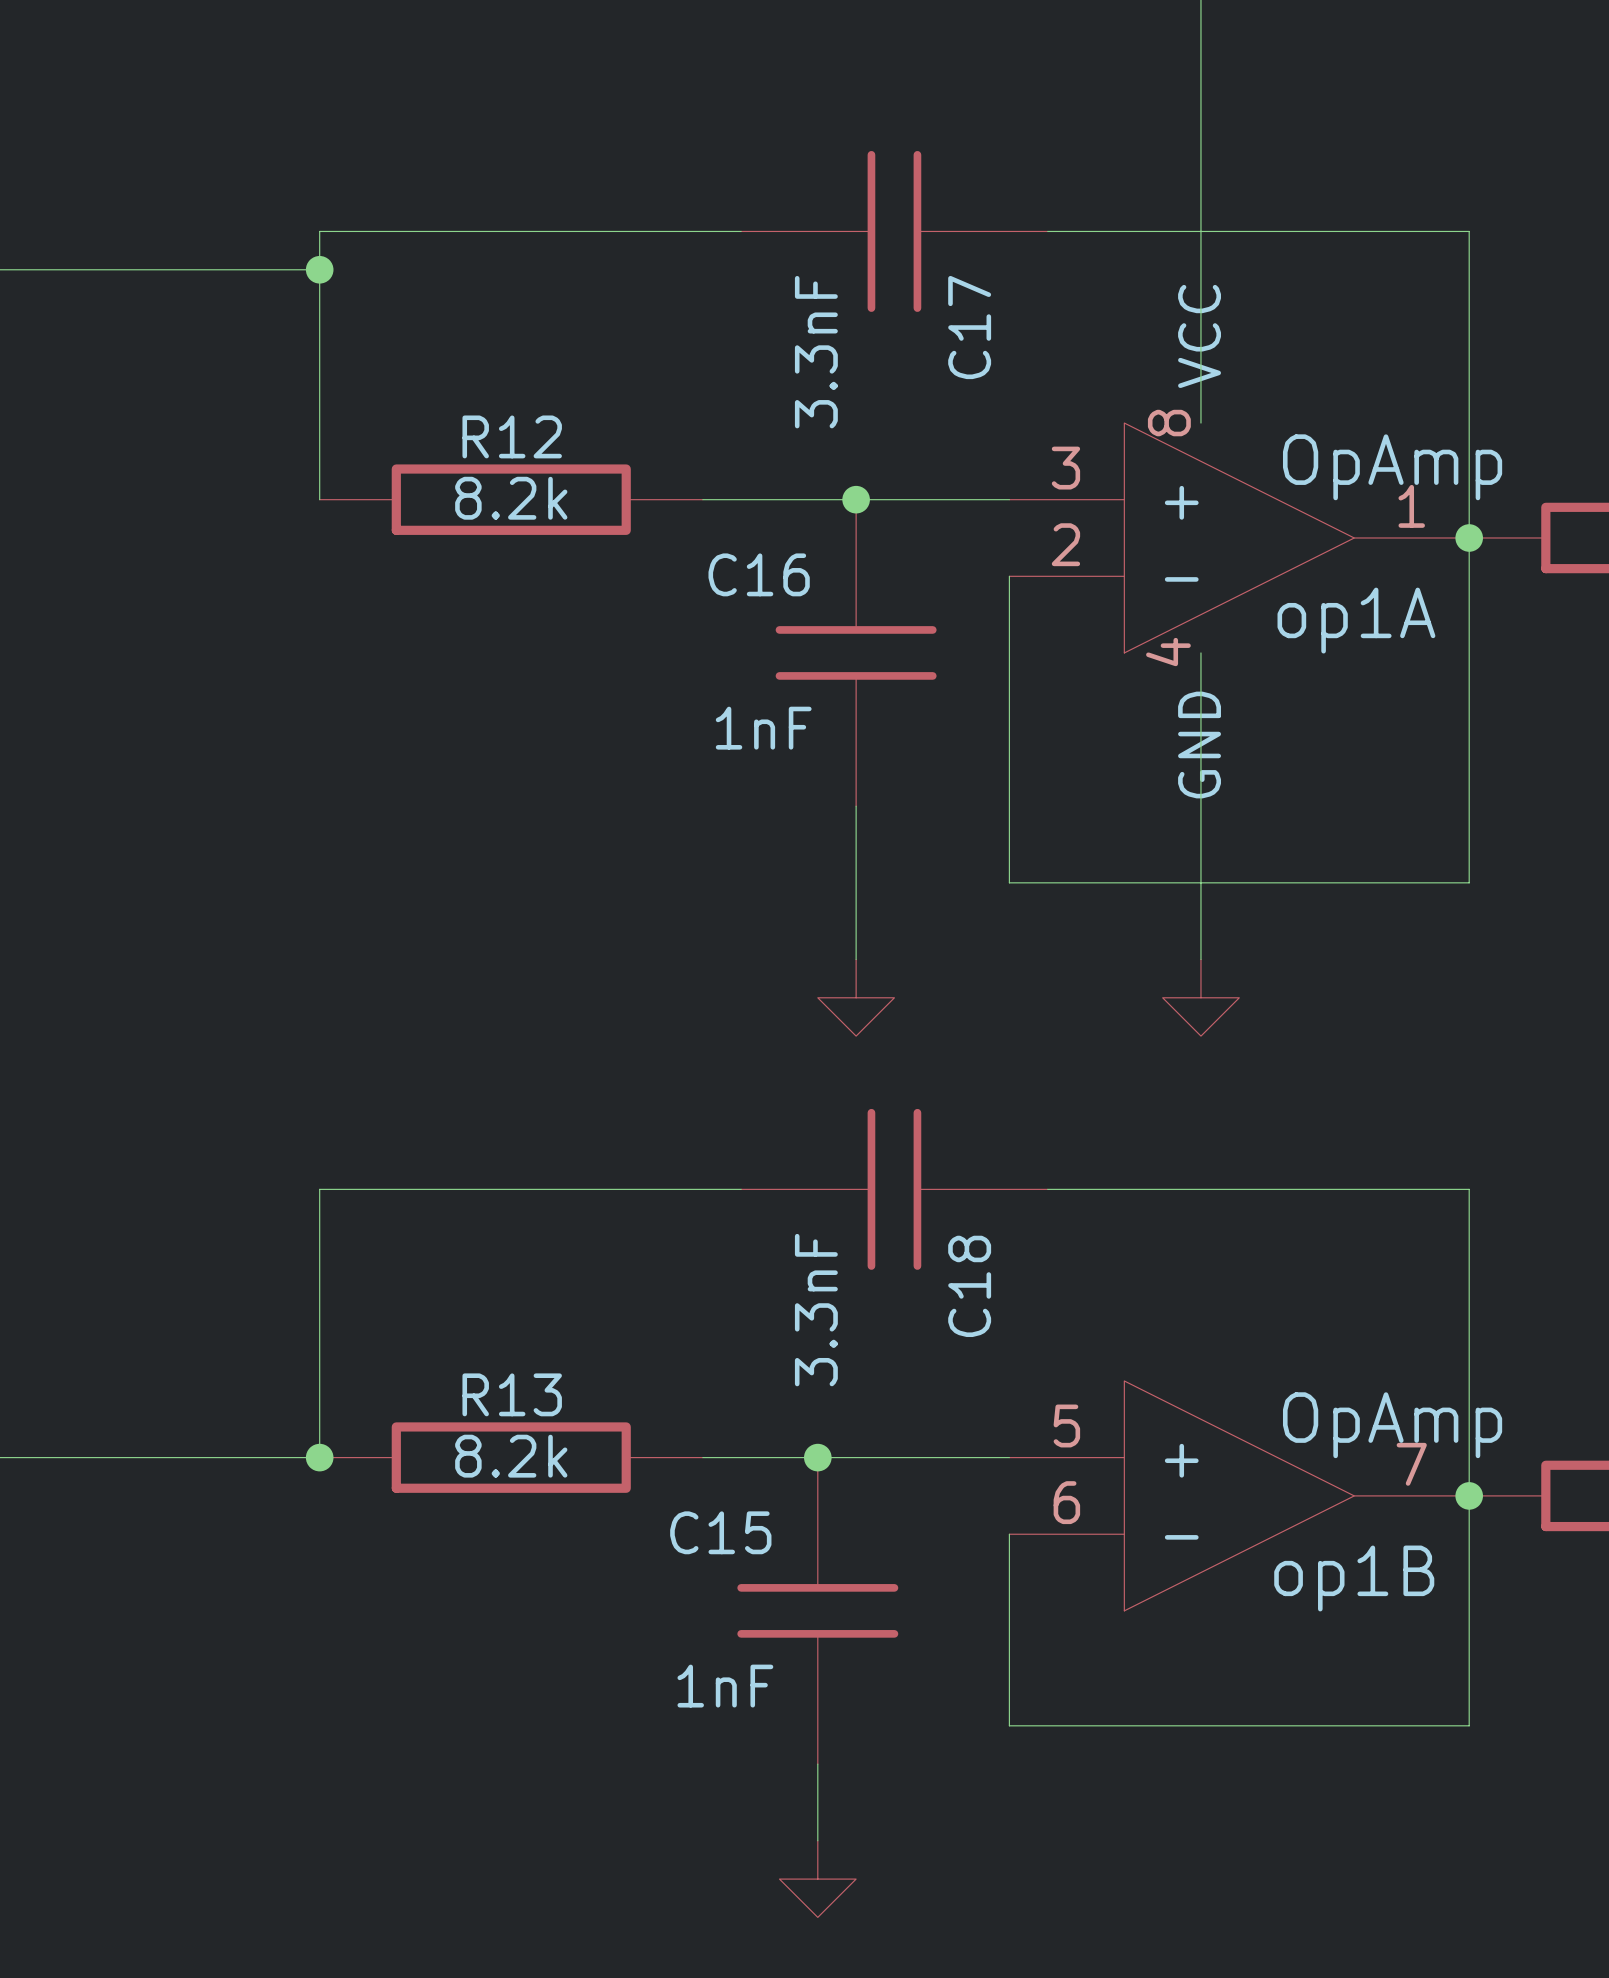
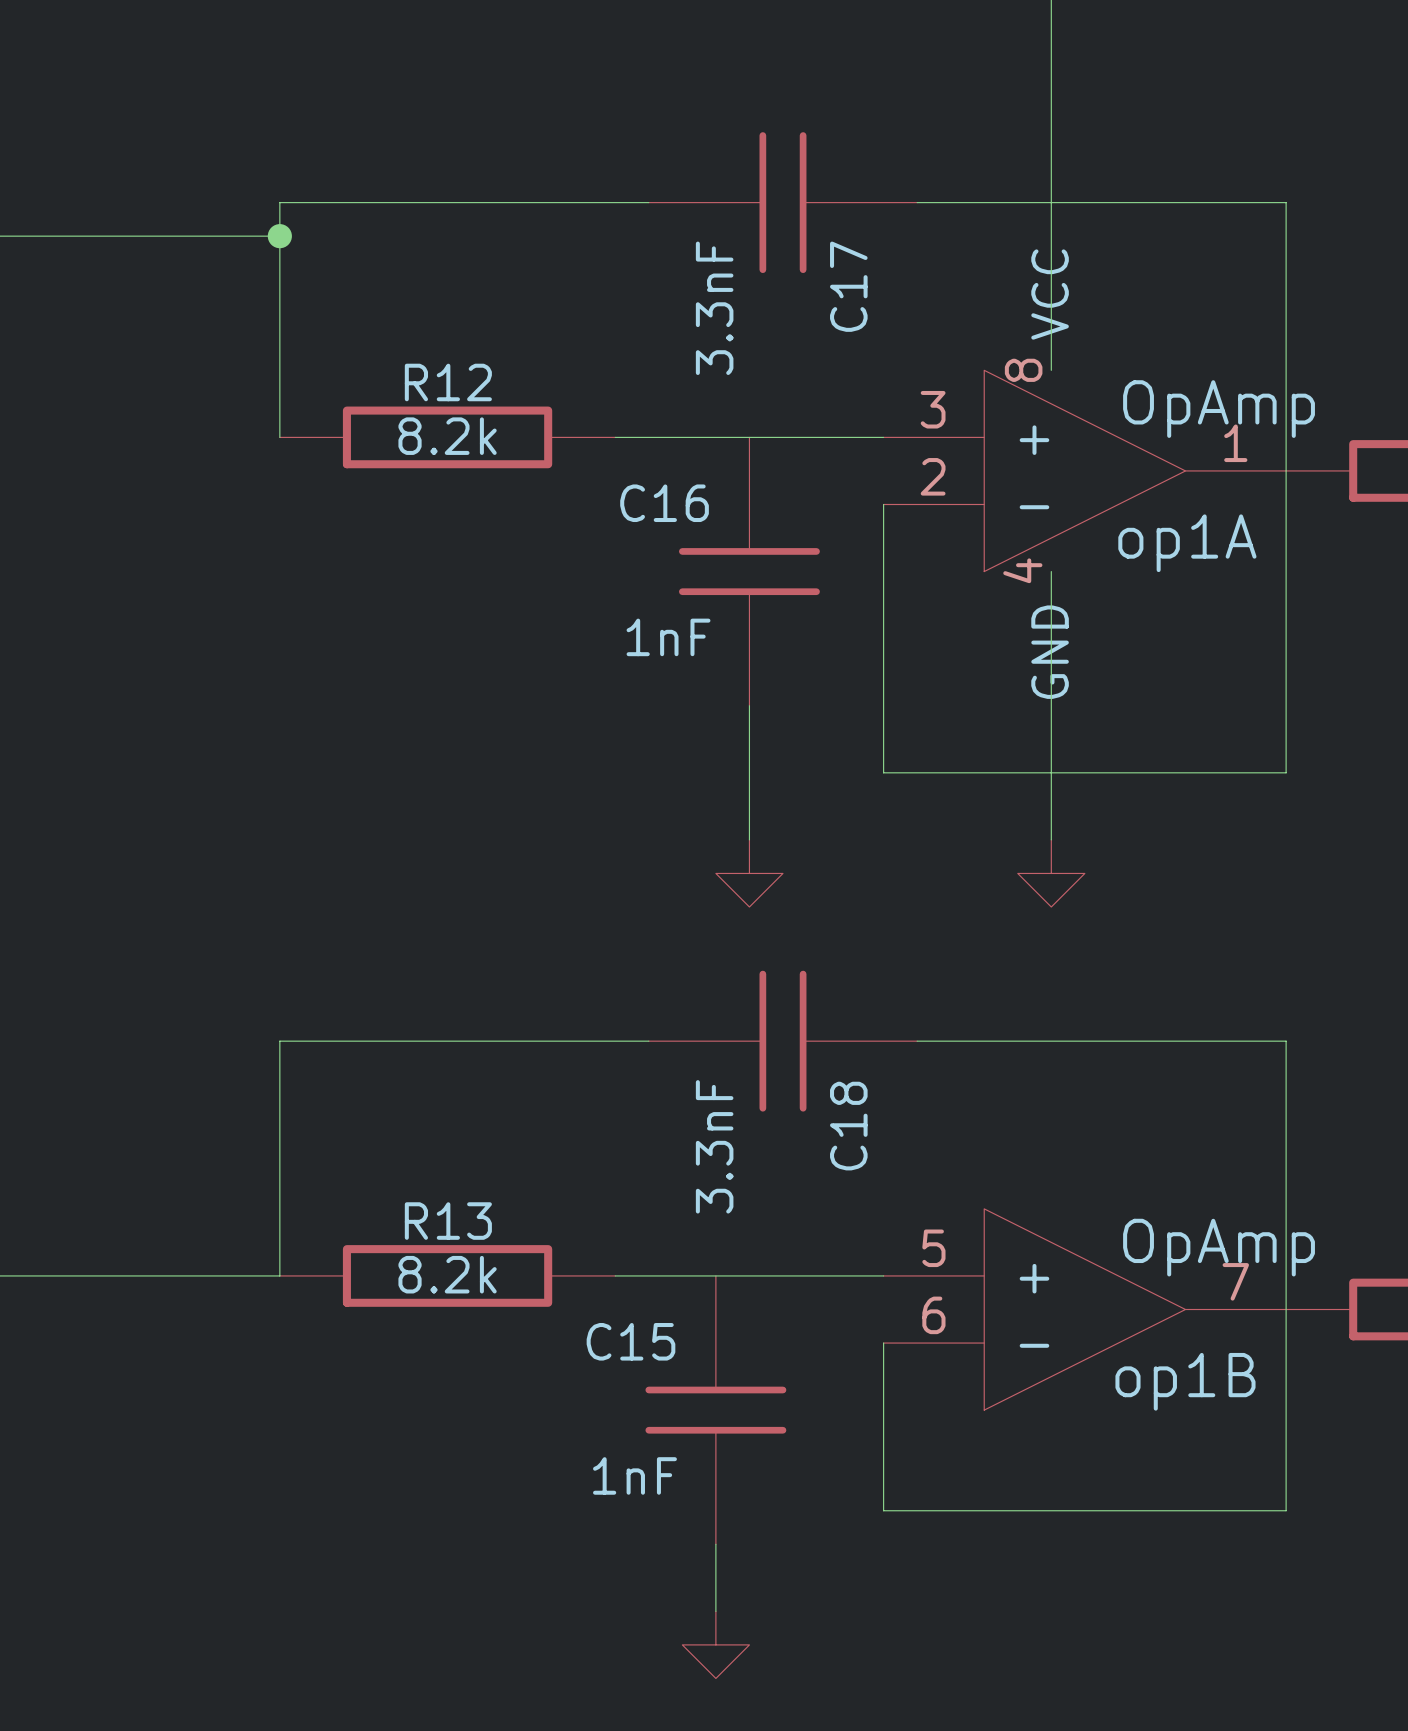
junction: (856, 499) -> none
junction: (1469, 537) -> none
junction: (319, 1457) -> none
junction: (817, 1457) -> none
junction: (1469, 1495) -> none

